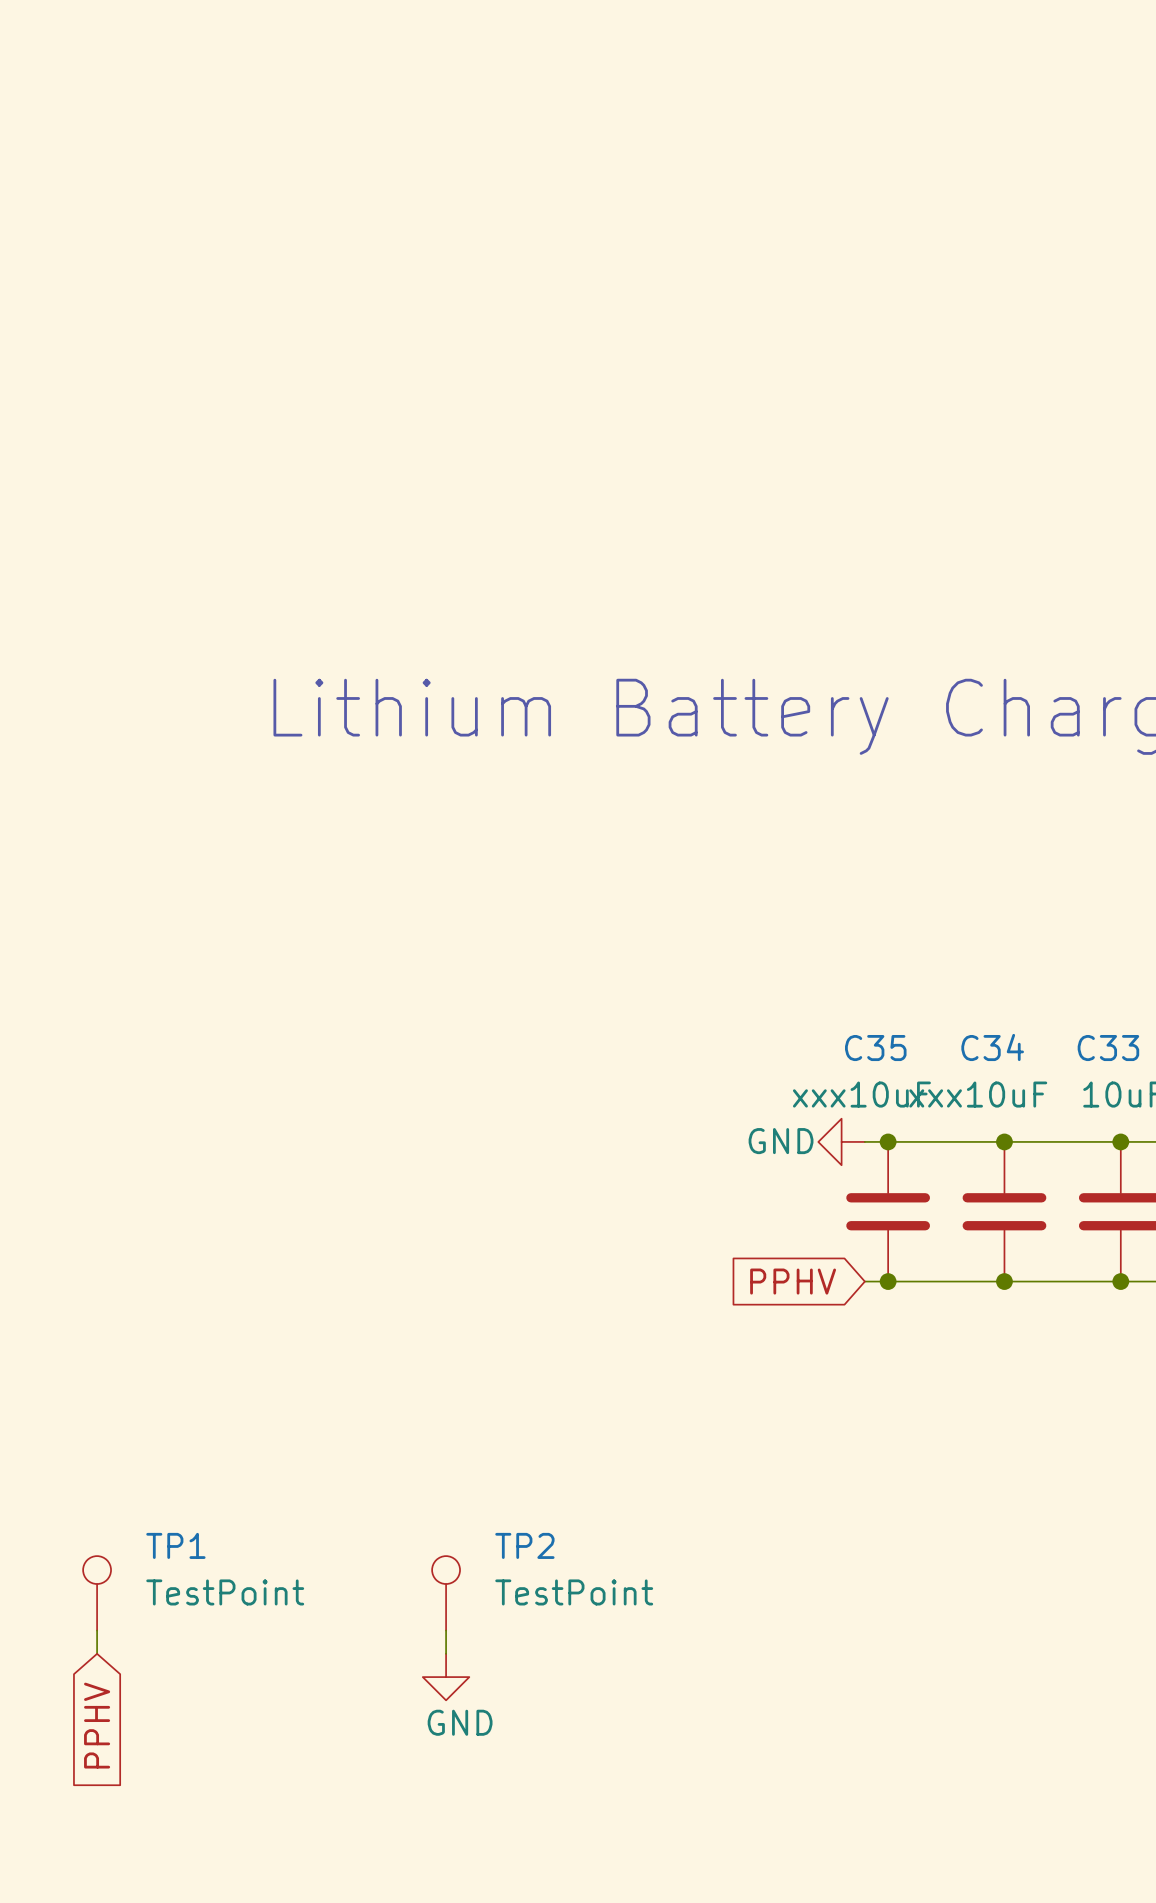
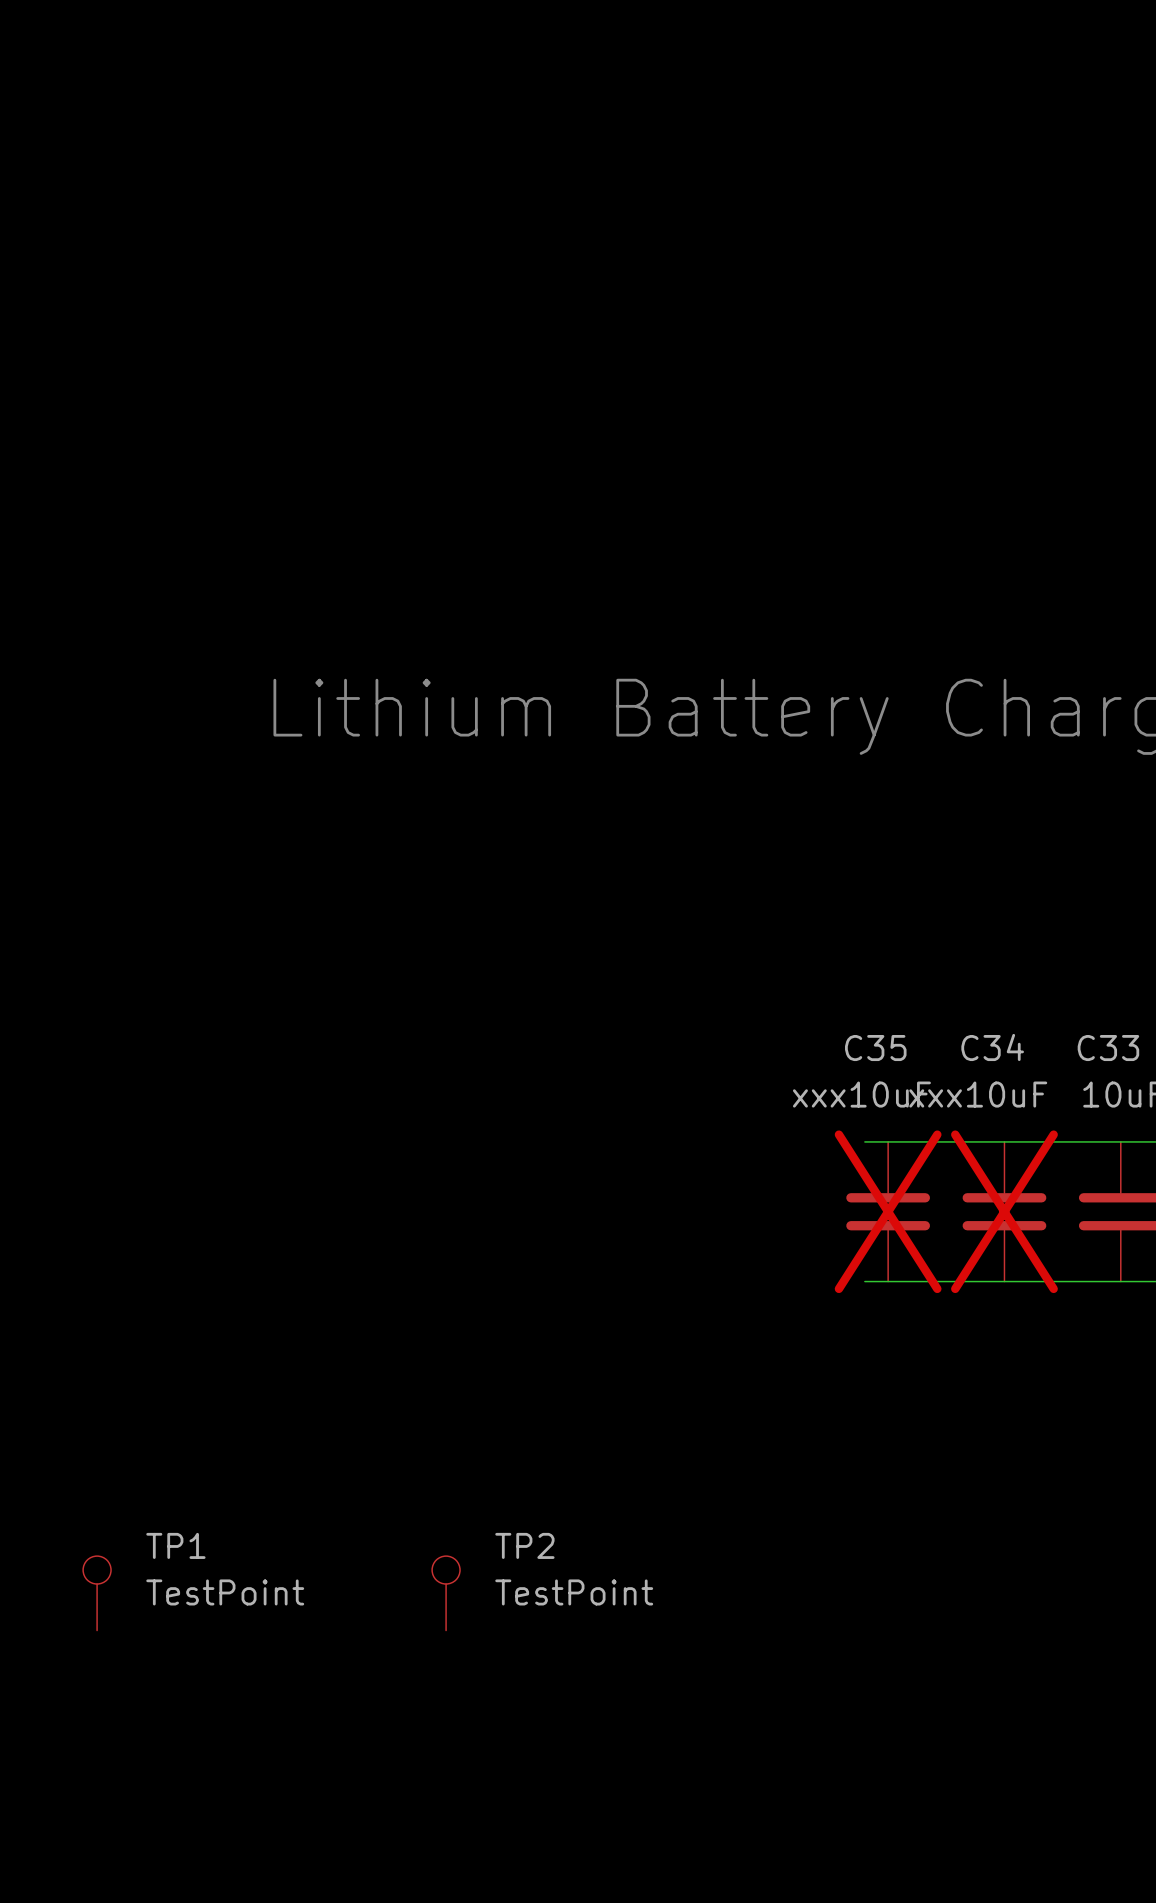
power symbol: GND (841, 1141) -> none
junction: (888, 1141) -> none
junction: (1004, 1141) -> none
junction: (1120, 1141) -> none
C35 do-not-place cross: none -> (888, 1211)
C34 do-not-place cross: none -> (1004, 1211)
global label: PPHV (793, 1281) -> none
junction: (888, 1281) -> none
junction: (1004, 1281) -> none
junction: (1120, 1281) -> none
wire: (97, 1630) (97, 1653) -> none
wire: (446, 1630) (446, 1653) -> none
power symbol: GND (446, 1677) -> none
global label: PPHV (97, 1725) -> none

